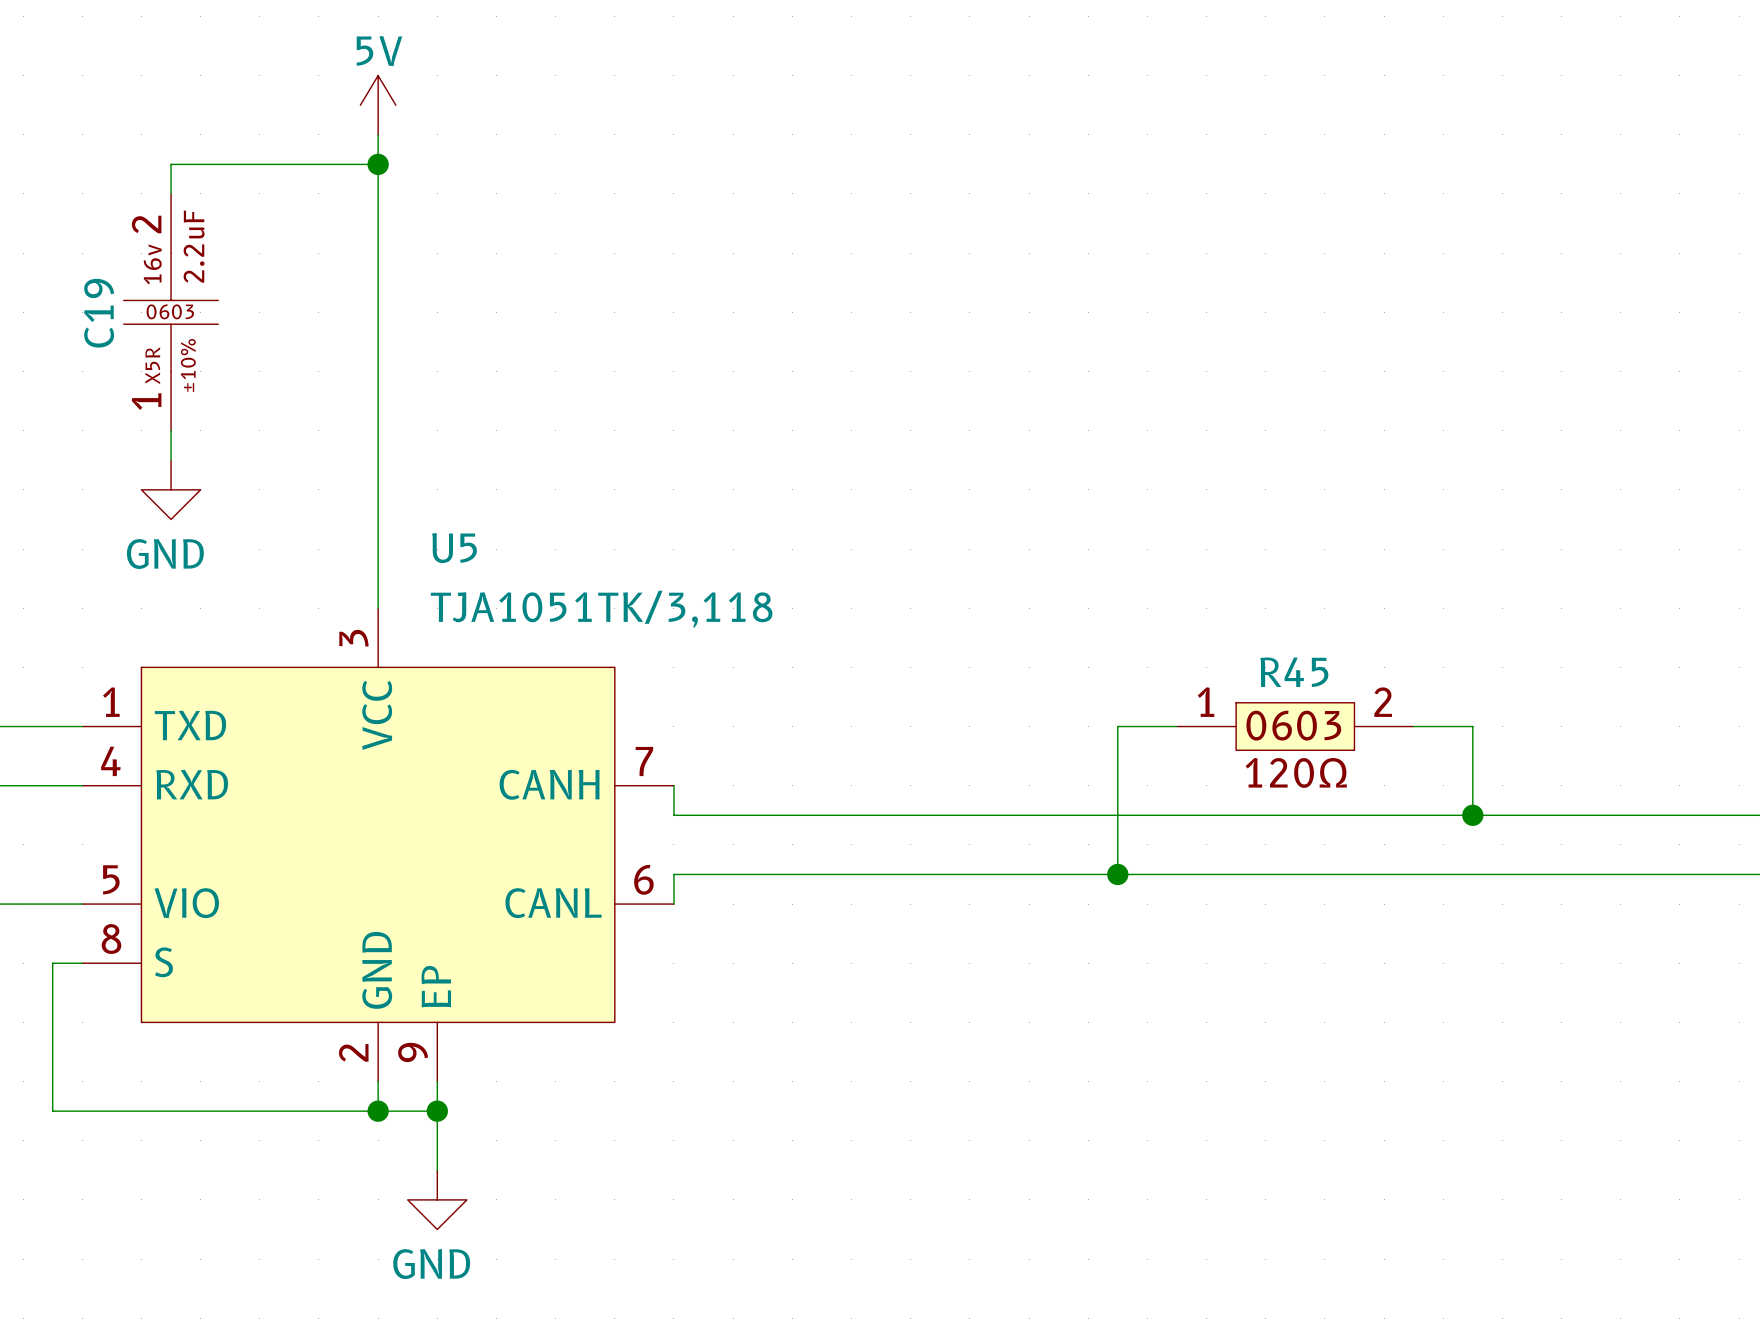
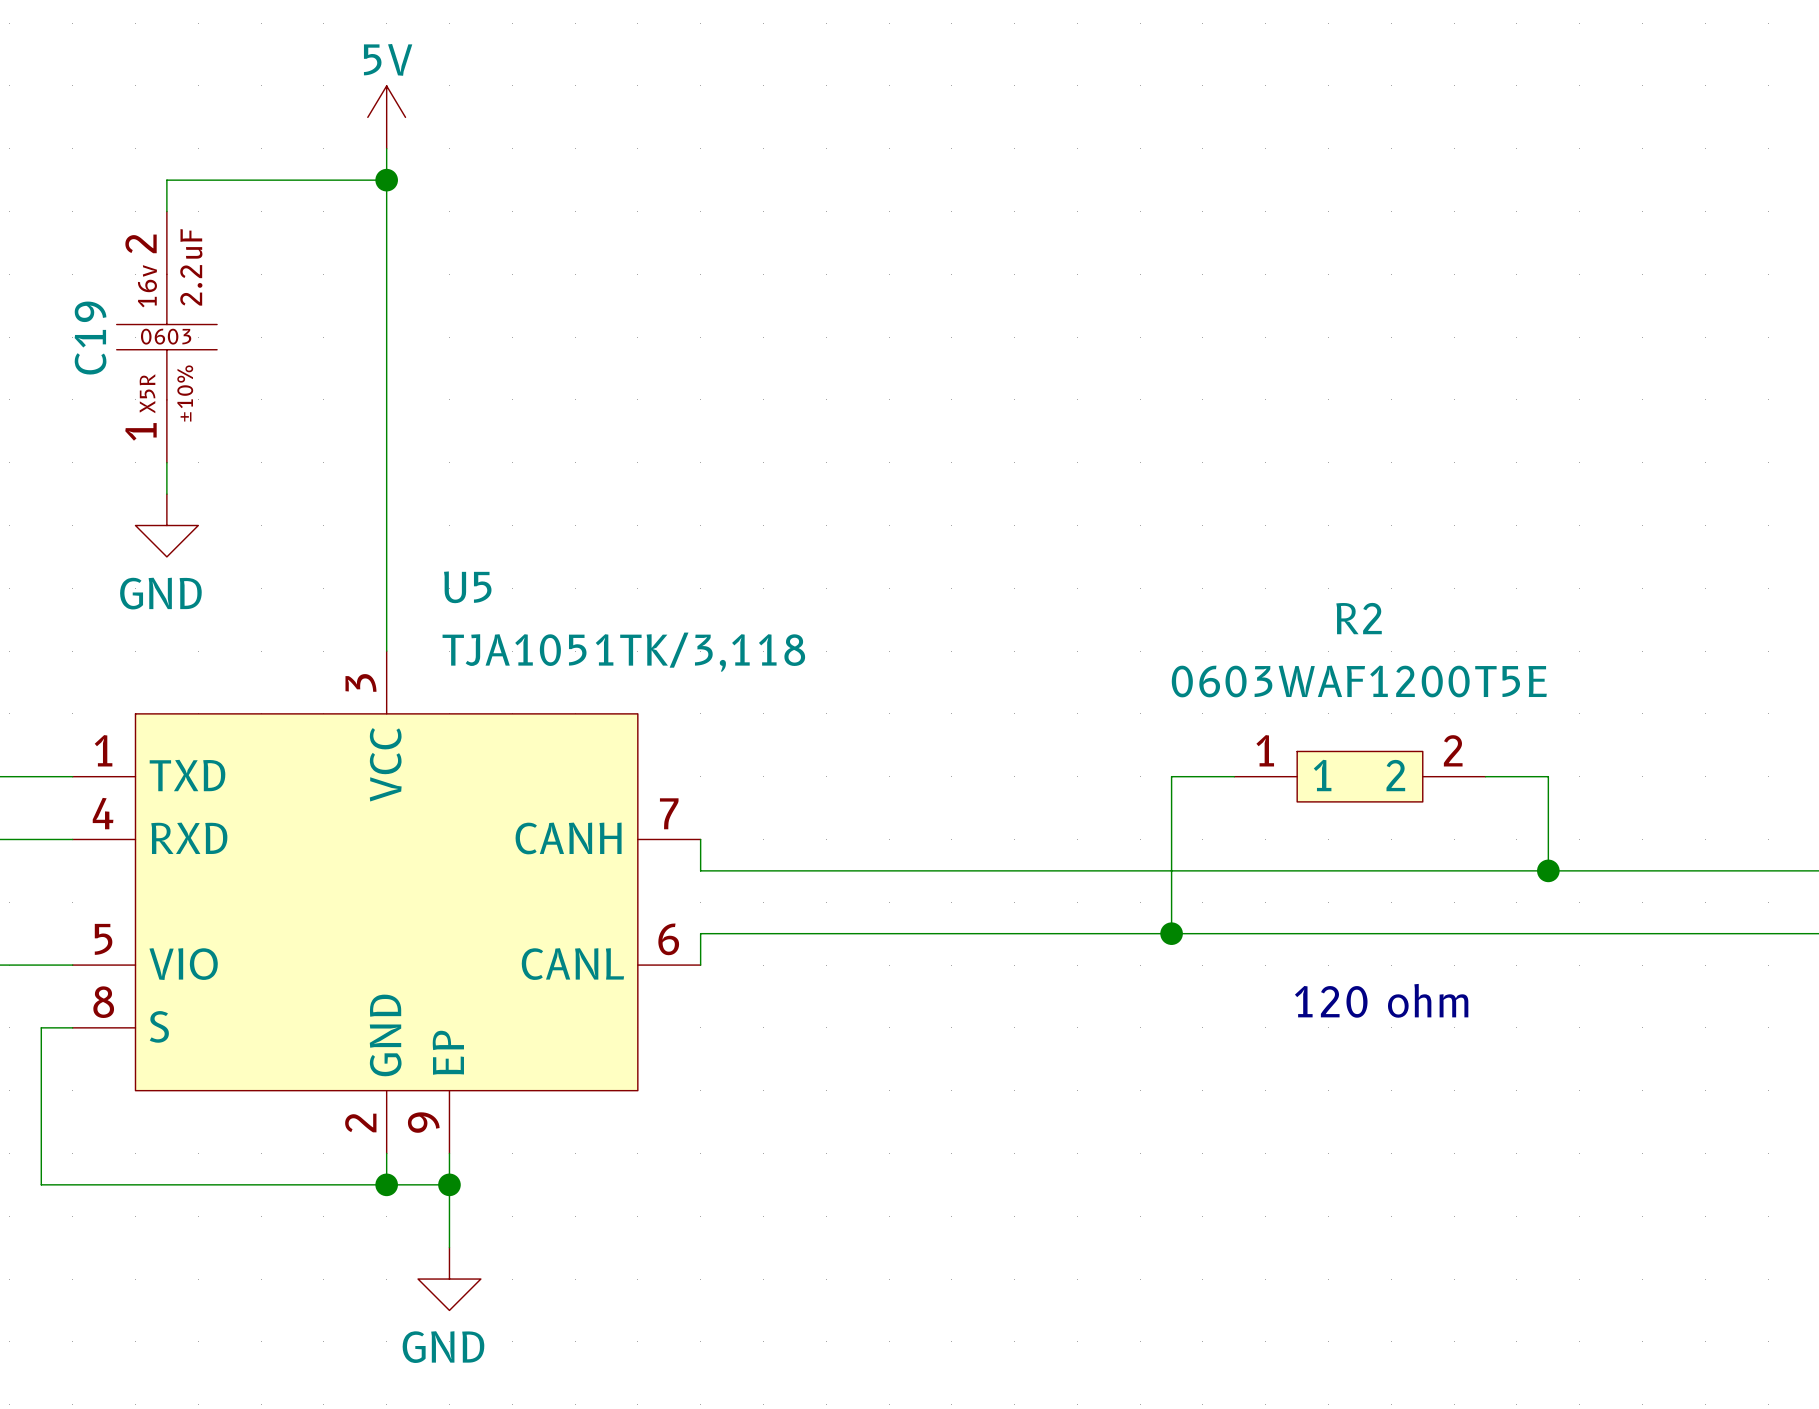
R45 value: none -> 0603WAF1200T5E (1359, 681)
R45 name: R45 (1294, 672) -> R2 (1359, 618)
R45 pin name: none -> 1 (1322, 775)
R45 text: 0603 (1293, 725) -> none
R45 pin name: none -> 2 (1395, 775)
R45 text: 120Ω (1296, 772) -> none
text: none -> 120 ohm (1381, 1000)

